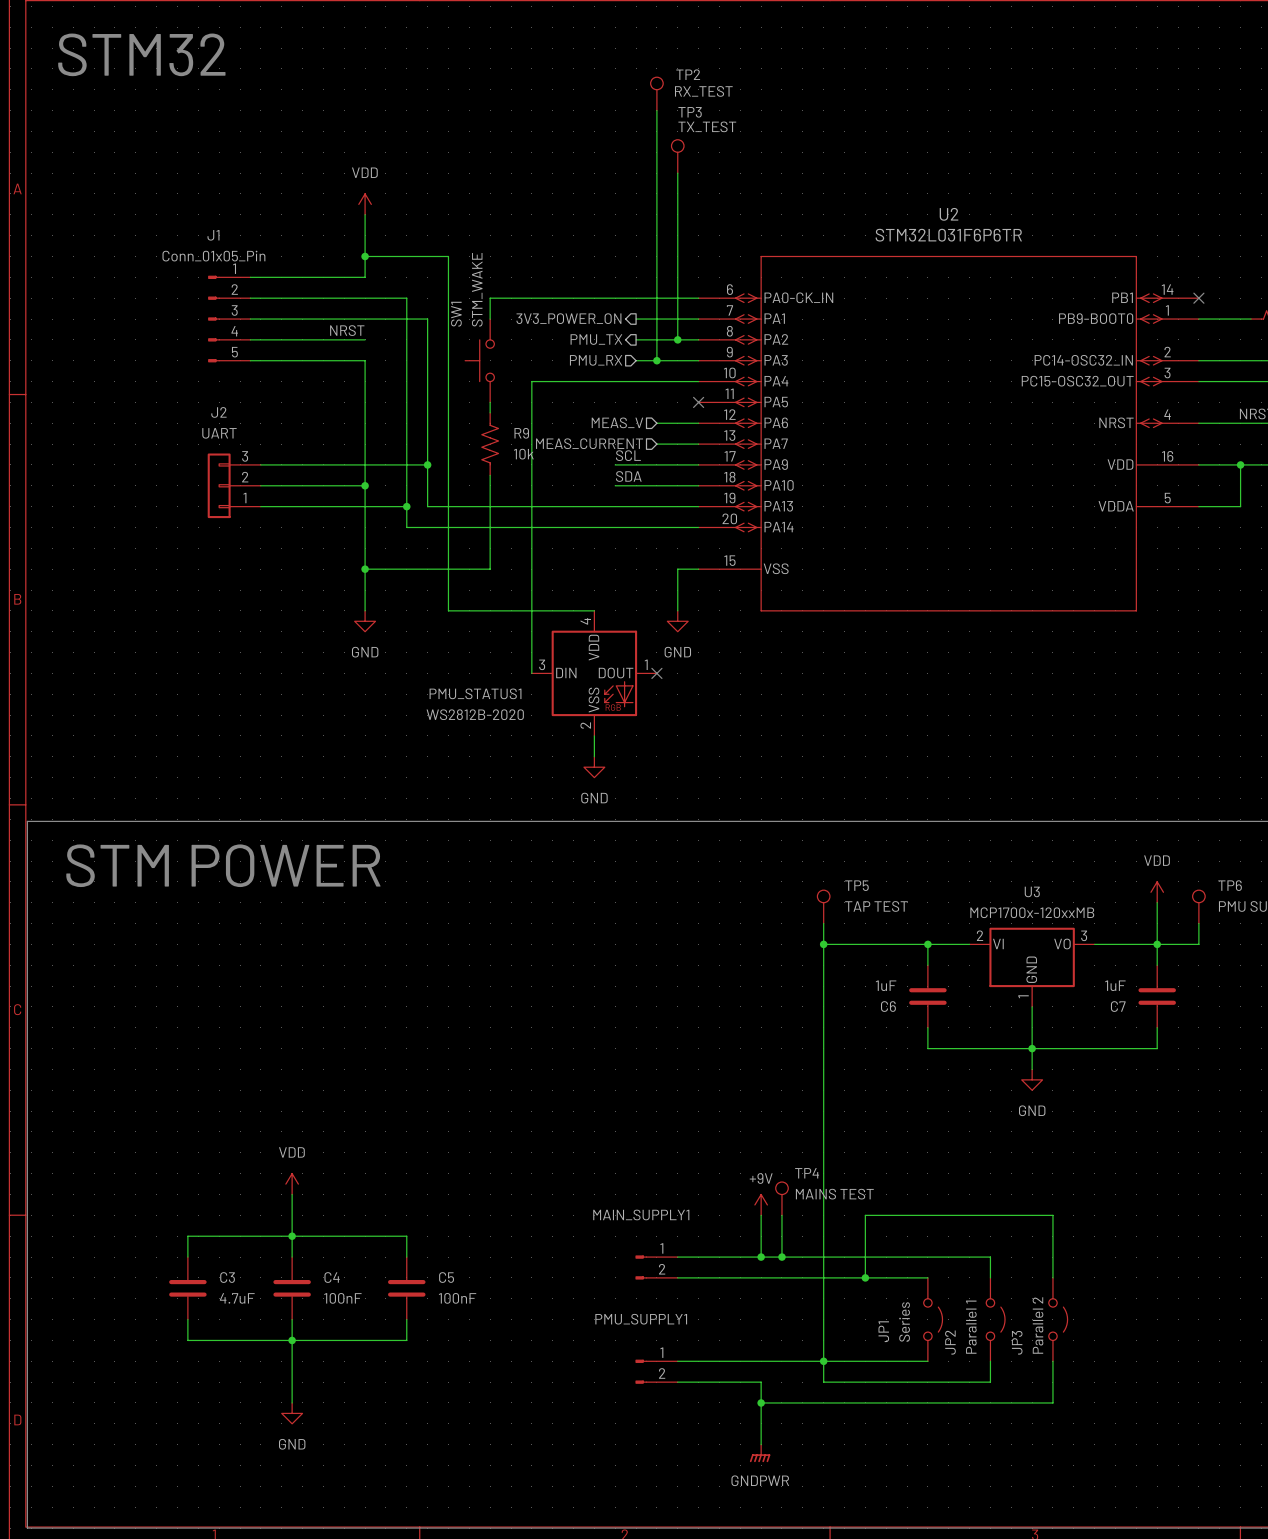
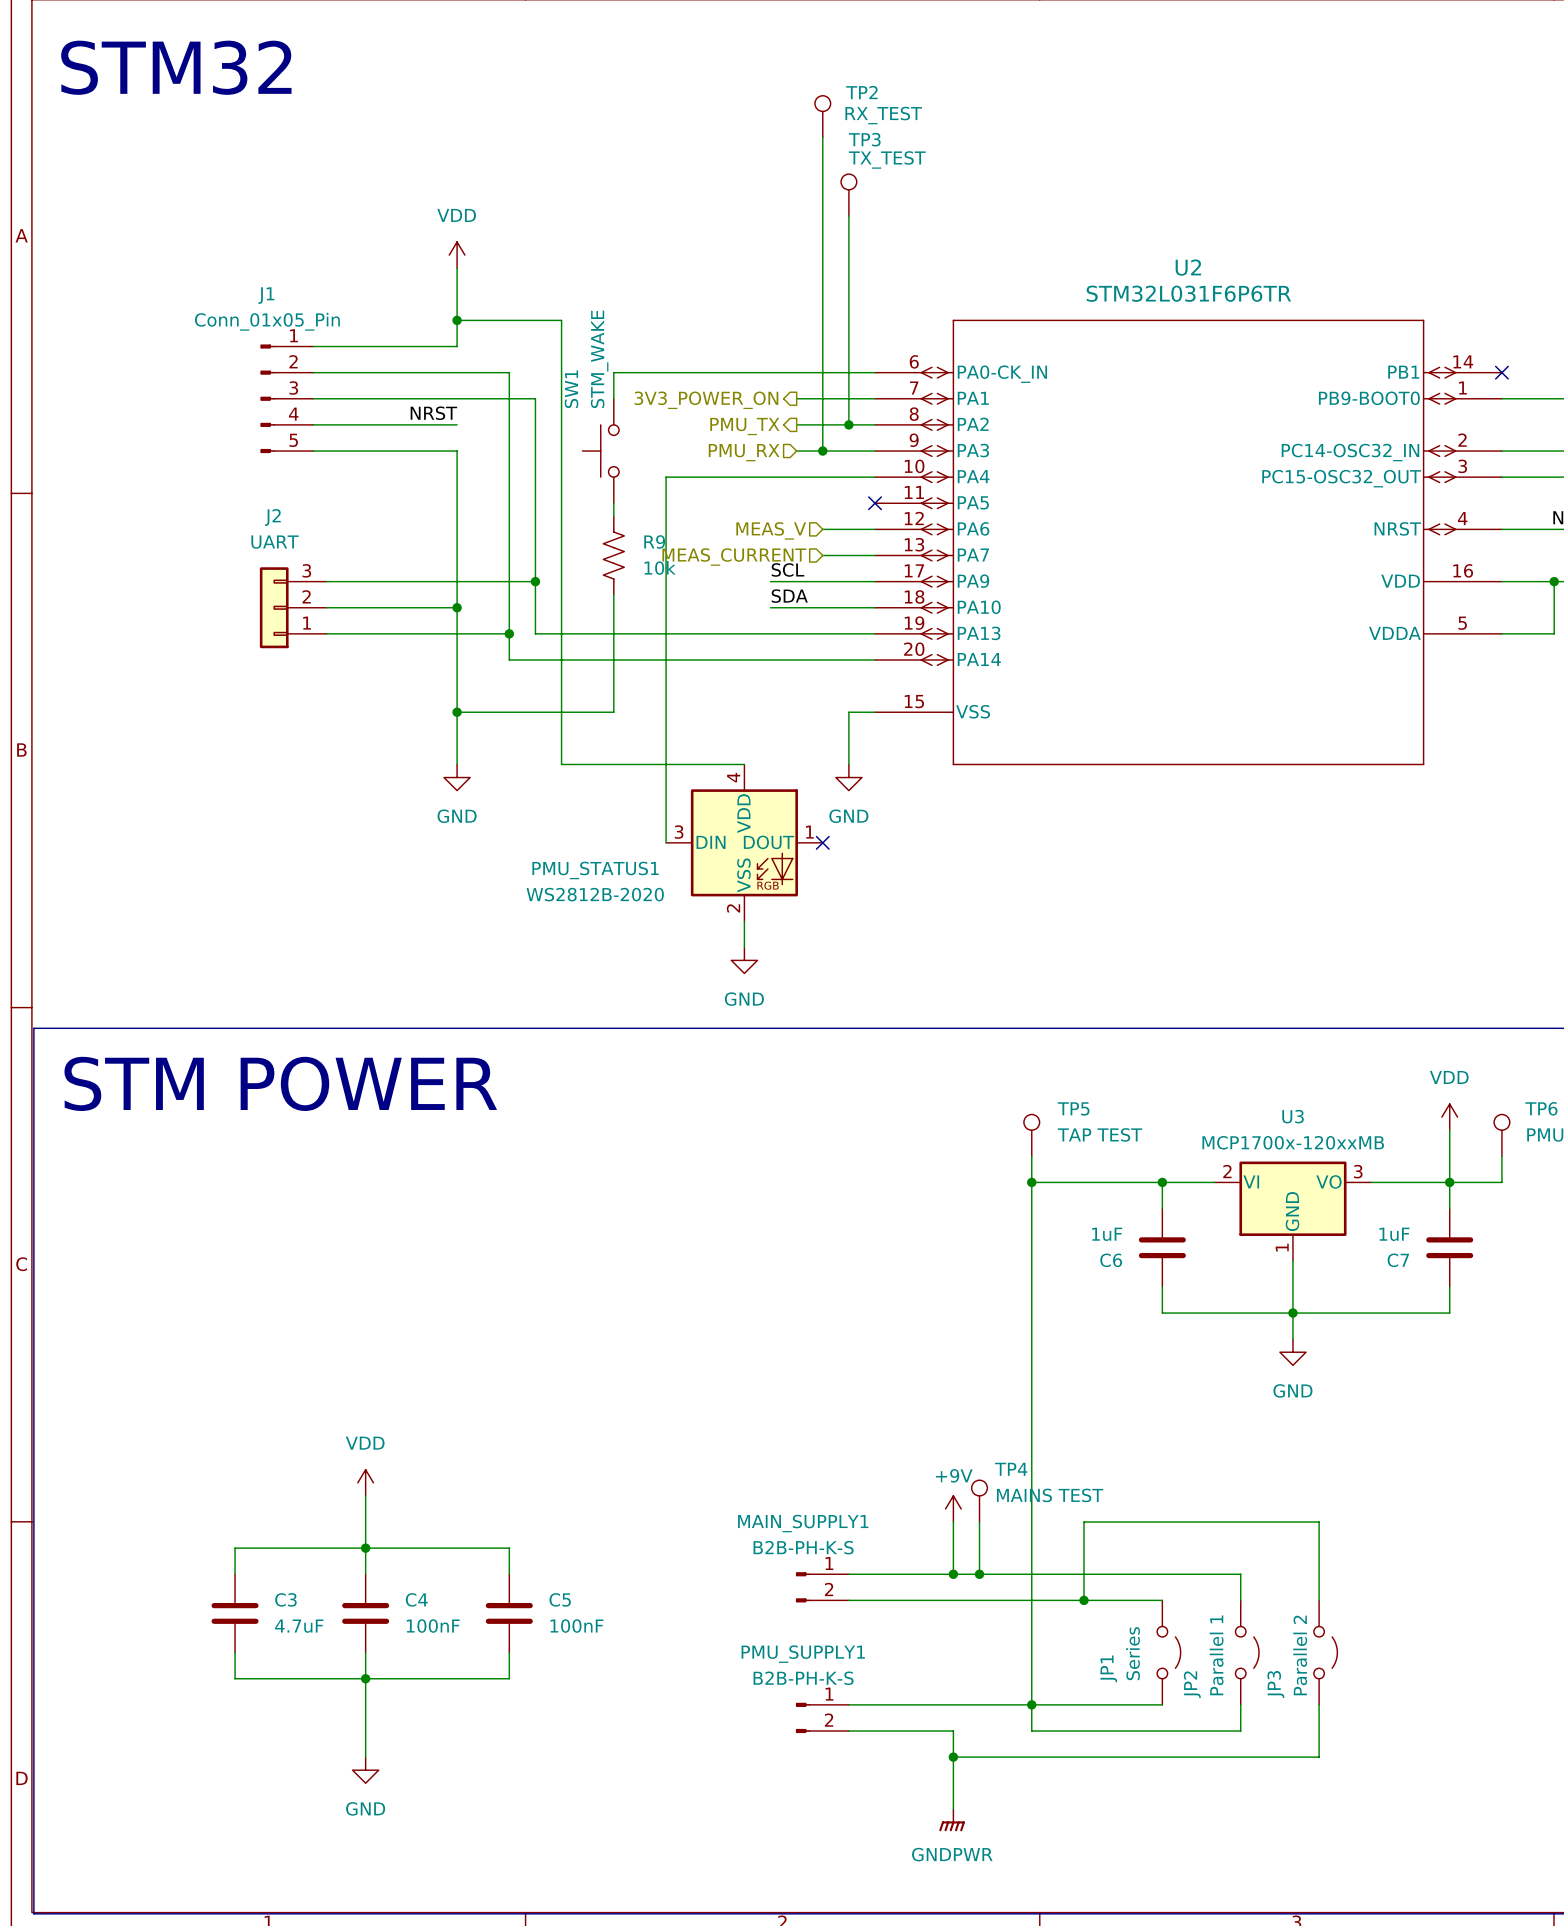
MAIN_SUPPLY1 value: none -> B2B-PH-K-S (803, 1547)
PMU_SUPPLY1 value: none -> B2B-PH-K-S (803, 1678)

